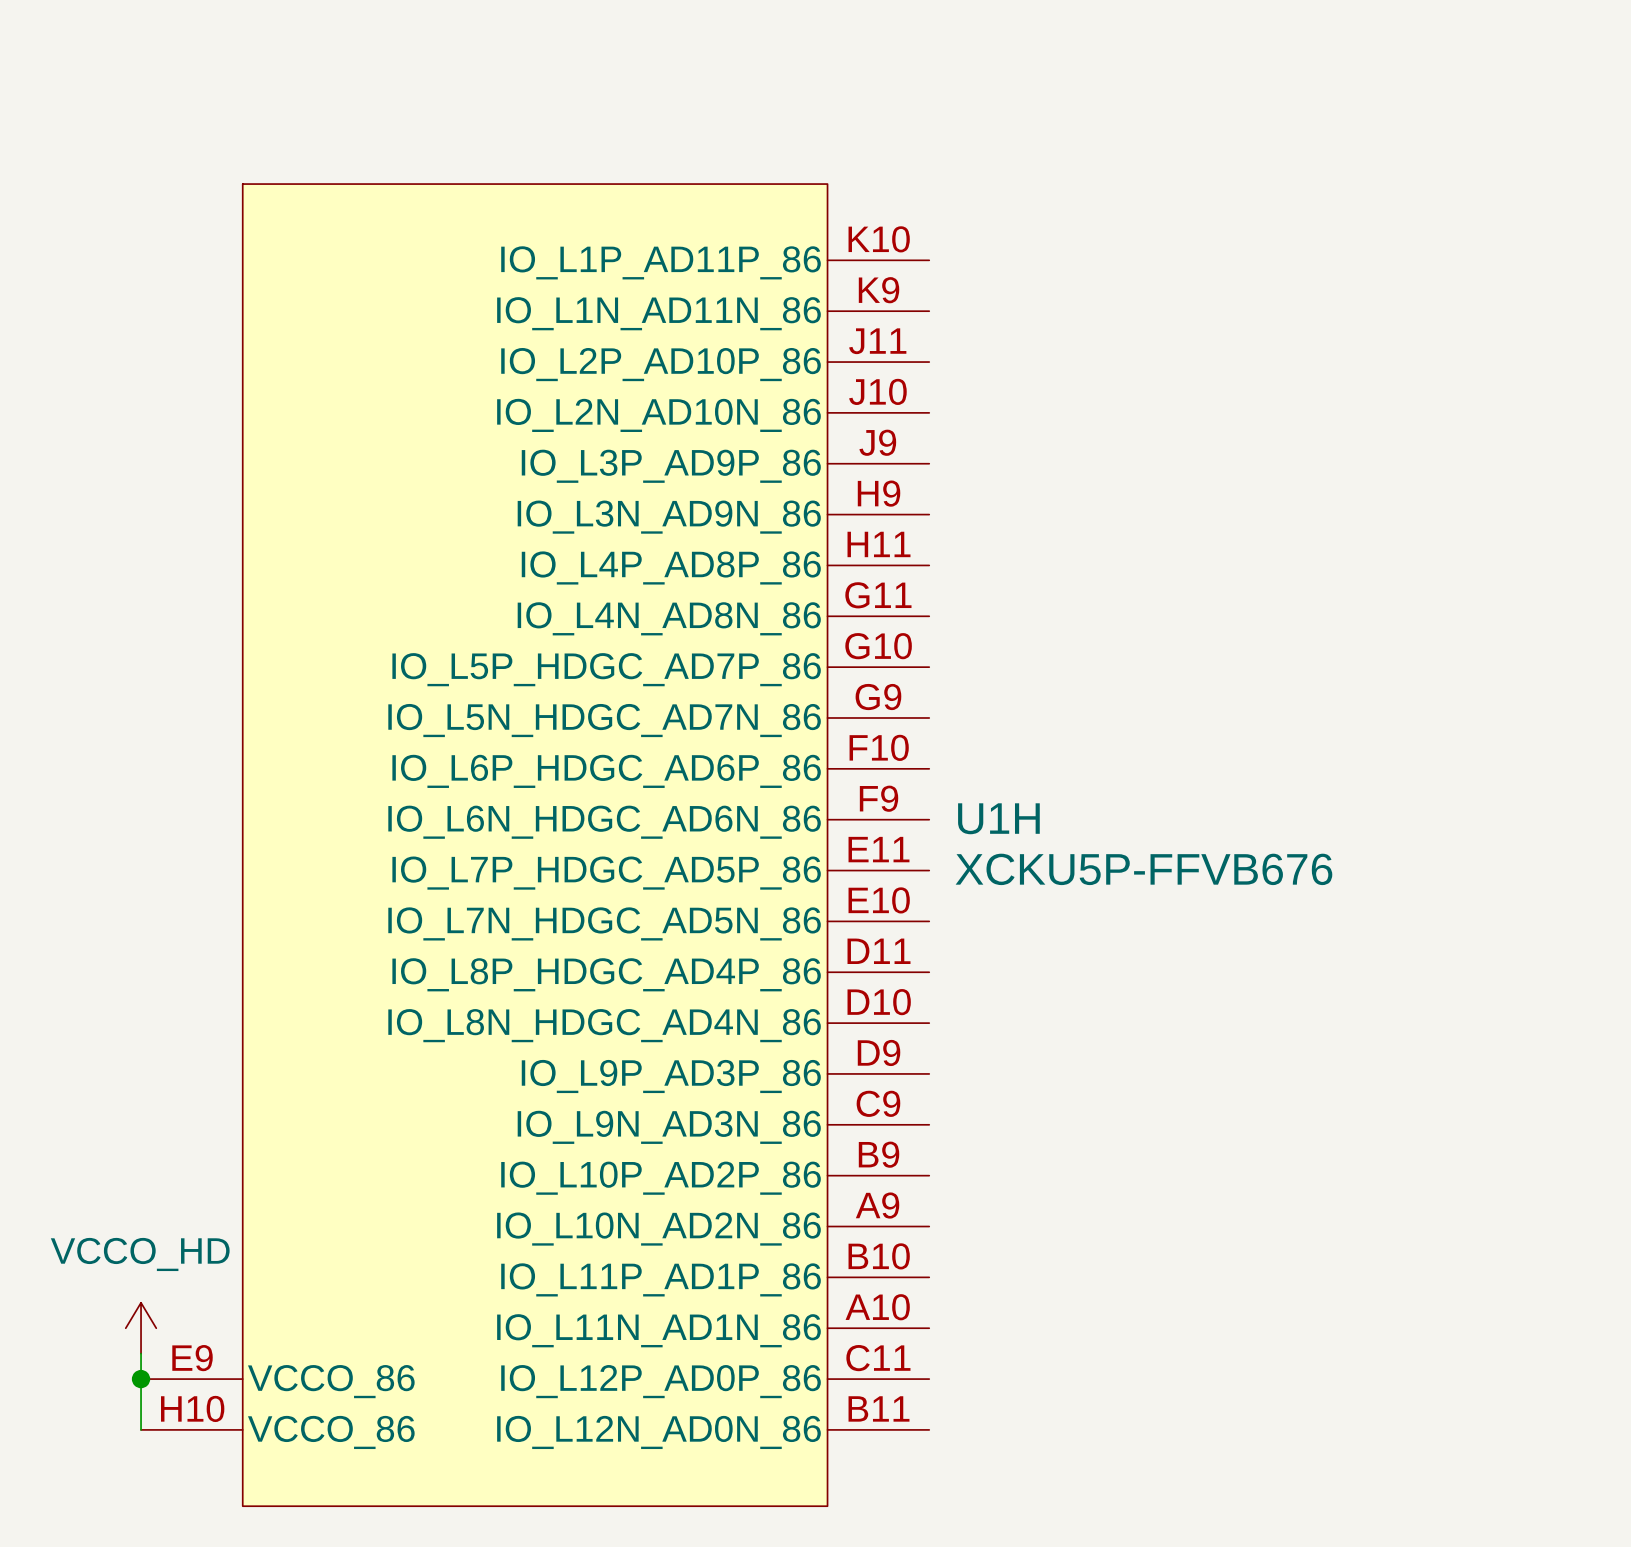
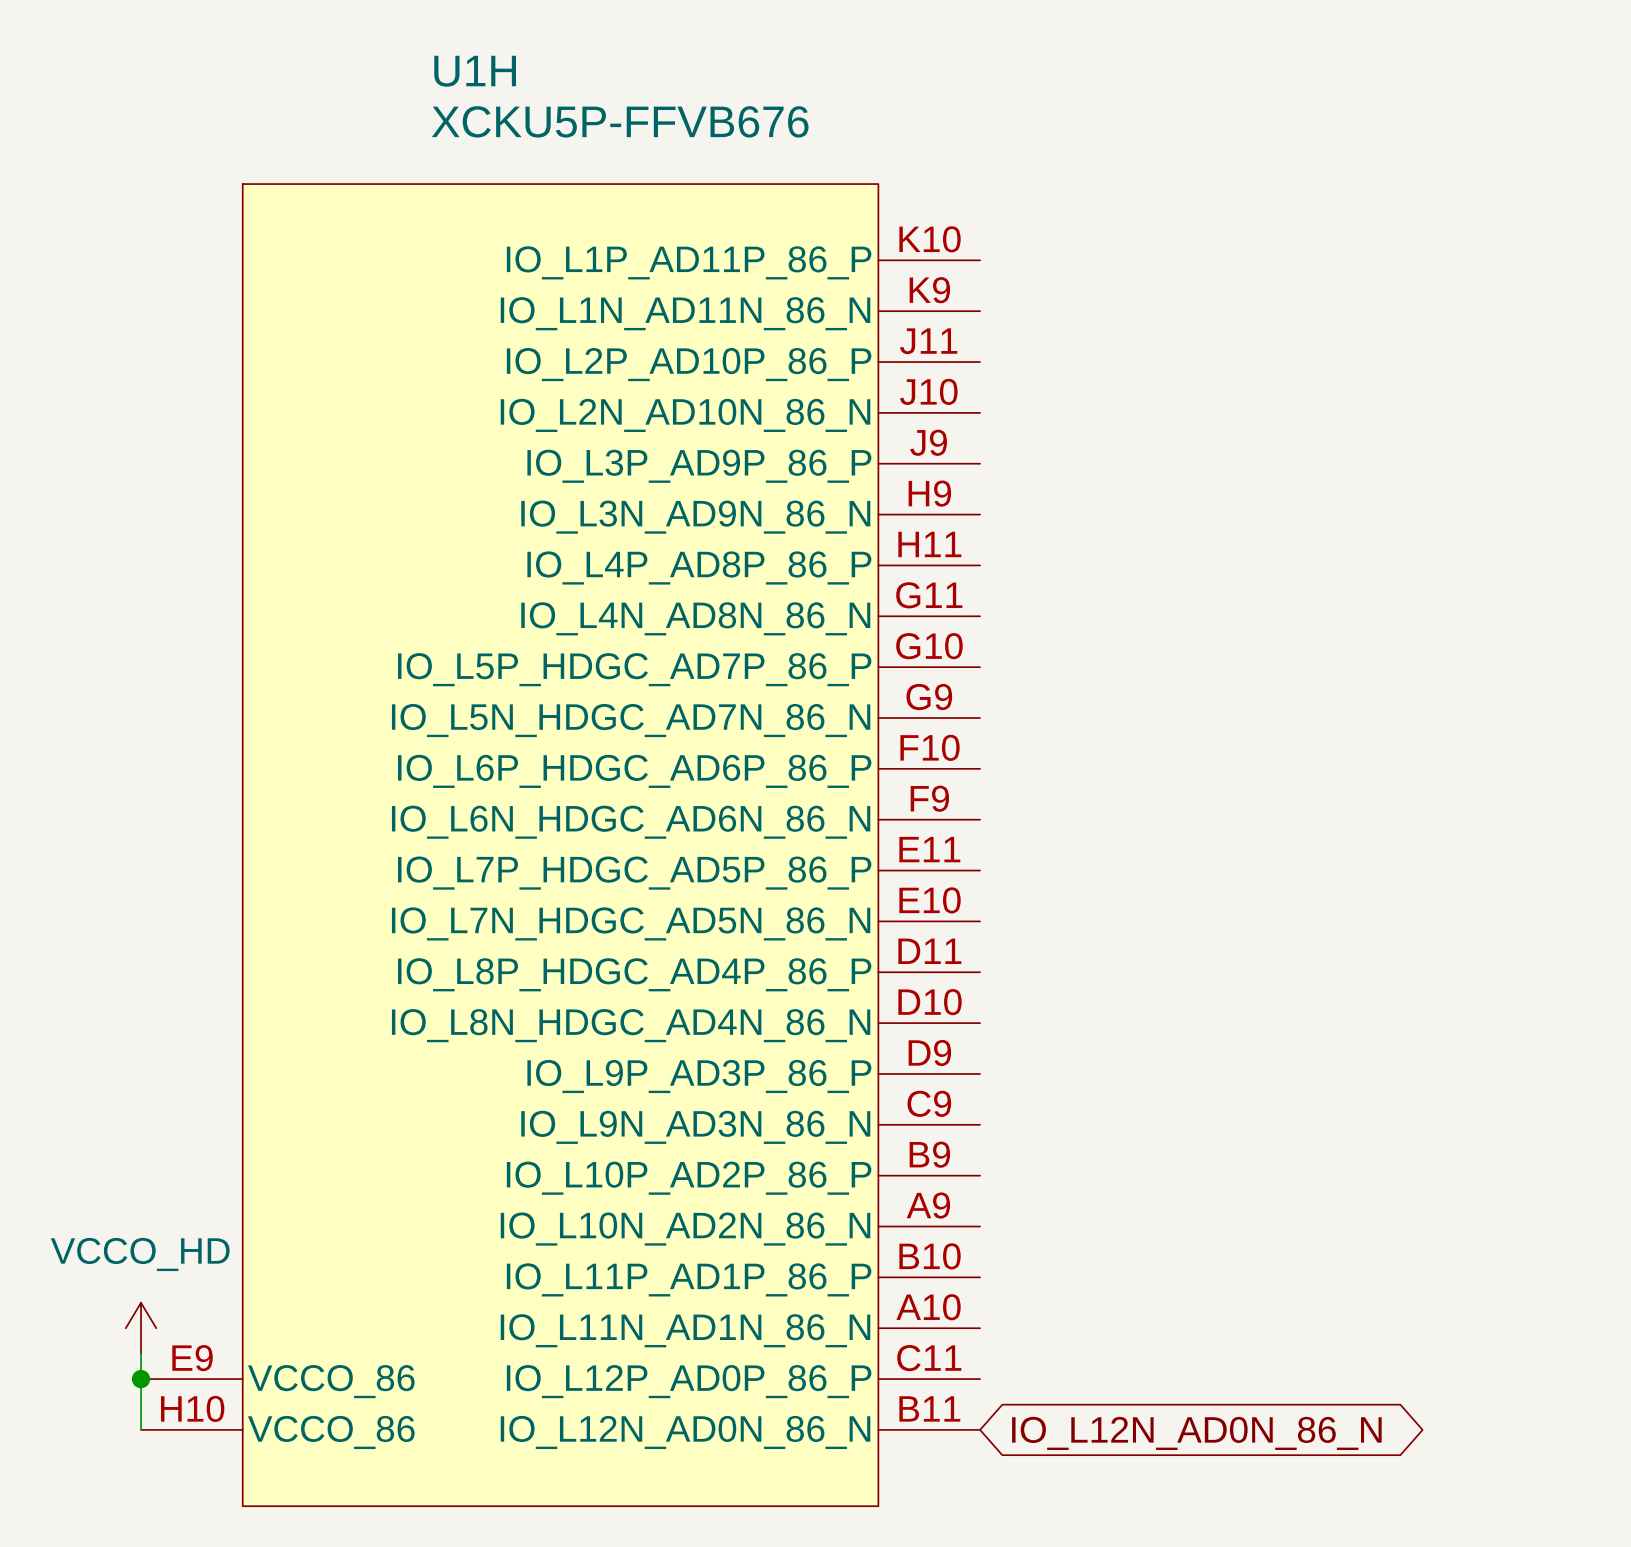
U1H symbol: [141, 184, 930, 1507] -> [141, 184, 981, 1507]
U1H name position: U1H (998, 818) -> U1H (475, 71)
U1H value position: XCKU5P-FFVB676 (1143, 869) -> XCKU5P-FFVB676 (620, 121)
global label: none -> IO_L12N_AD0N_86_N (1196, 1433)

